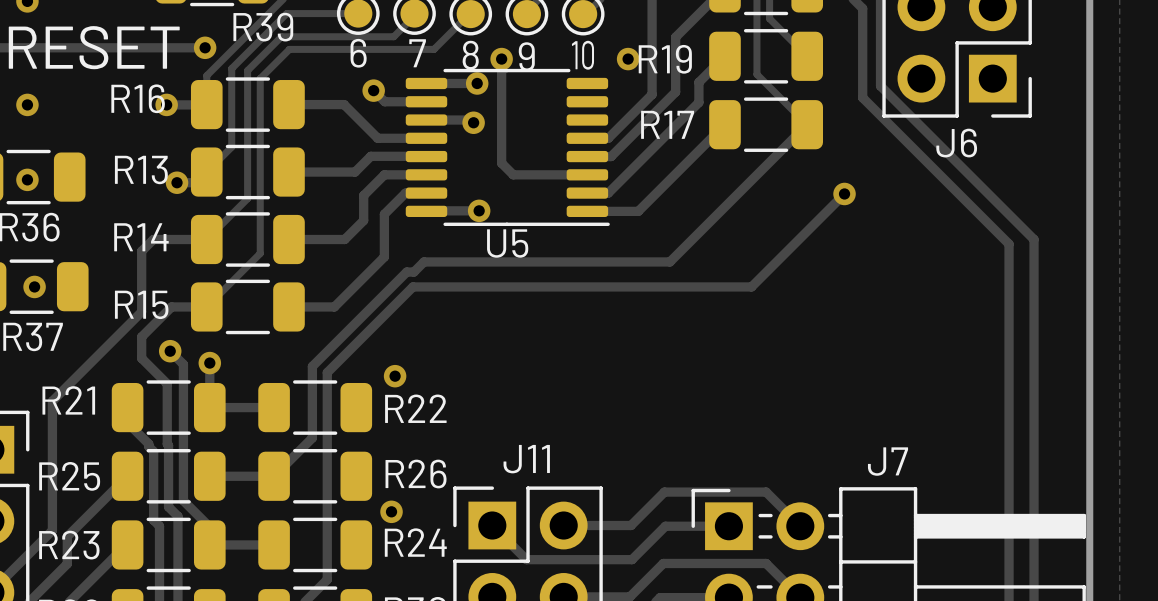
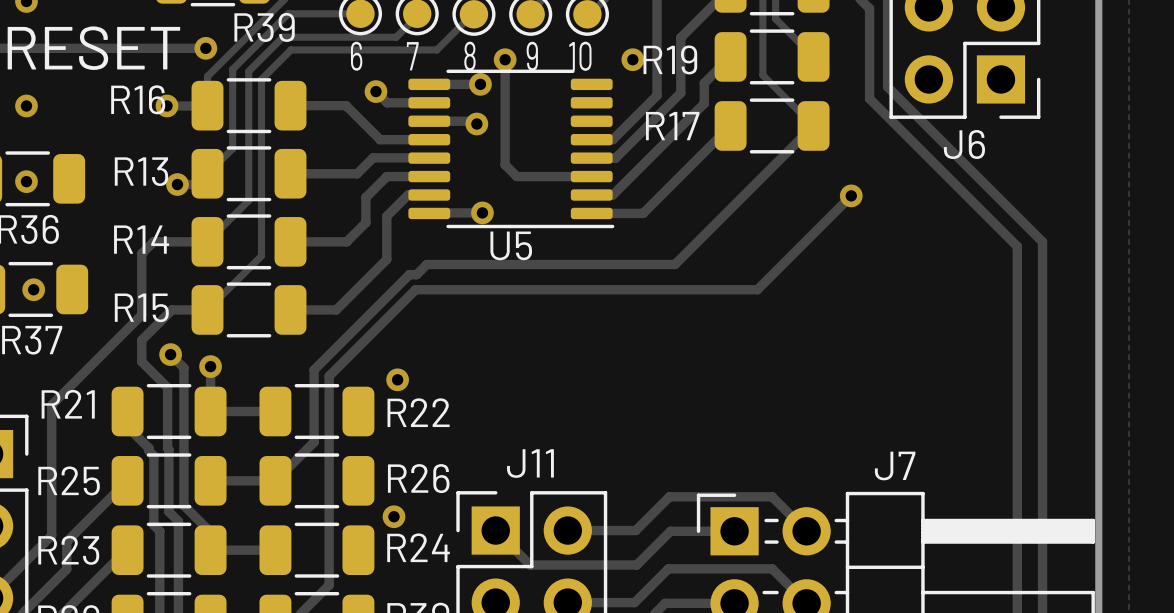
6 name: 6 (358, 53) -> none
7 name: 7 (417, 53) -> none
text: none -> 6 (356, 56)
text: none -> 7 (412, 56)
text: none -> 8 (469, 56)
8 name: 8 (470, 55) -> none
text: none -> 9 (532, 56)
text: none -> 10 (580, 56)
10 name: 10 (582, 55) -> none
9 name: 9 (526, 56) -> none

